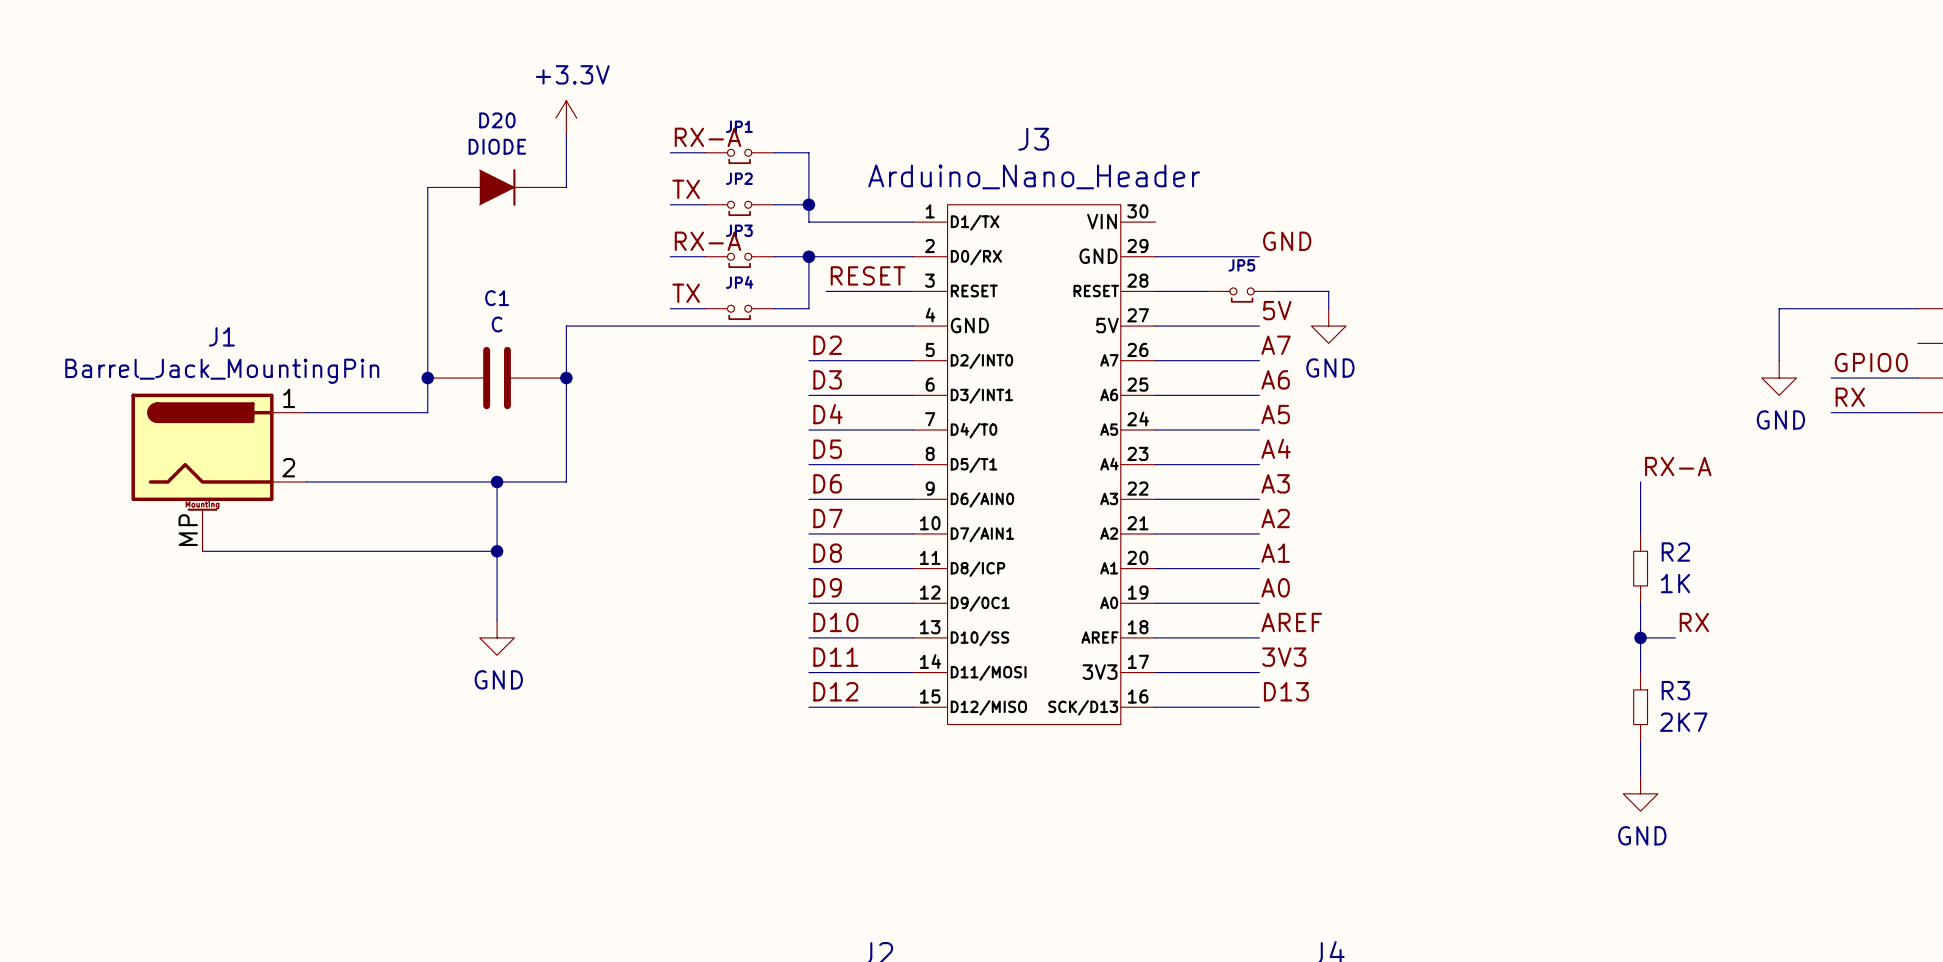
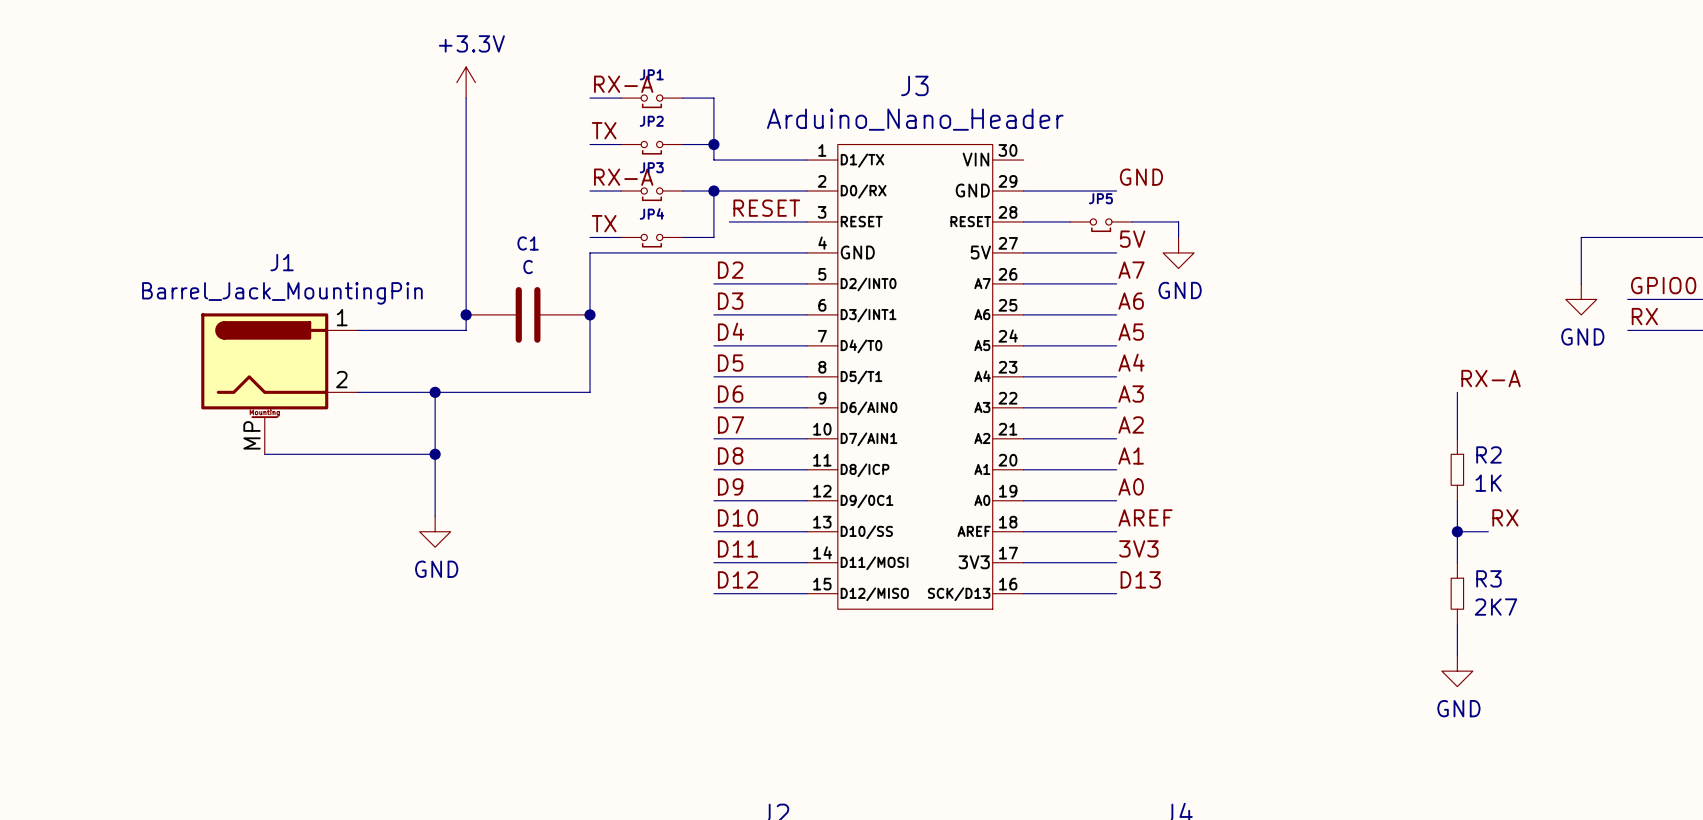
power symbol position: +3.3V (566, 118) -> +3.3V (466, 82)
wire: (566, 135) (566, 187) -> none
wire: (427, 187) (427, 412) -> (466, 98) (466, 330) (373, 330)
D20: DIODE (497, 187) -> none
wire: (670, 326) (566, 326) (566, 481) -> (590, 252) (590, 392) (497, 392)
junction: (427, 378) -> none
C1 position: (497, 378) -> (528, 314)
junction position: (566, 378) -> (466, 314)
junction: none -> (590, 314)
J1 position: (218, 472) -> (279, 383)
wire: (202, 551) (306, 551) -> none

